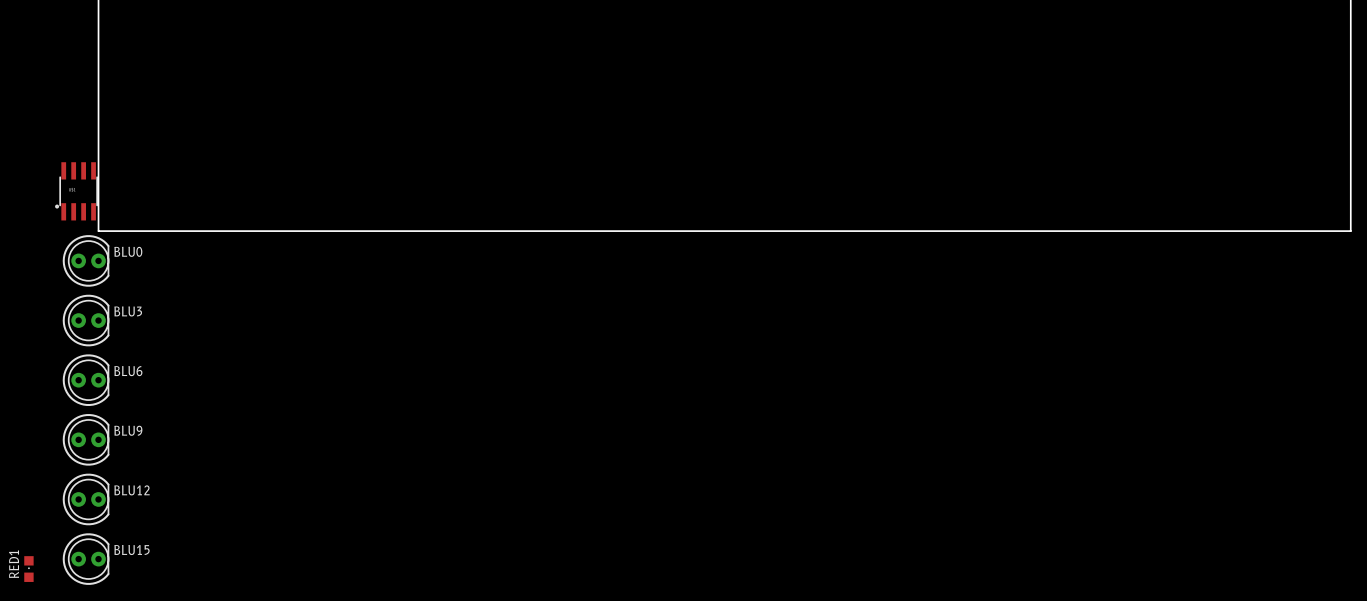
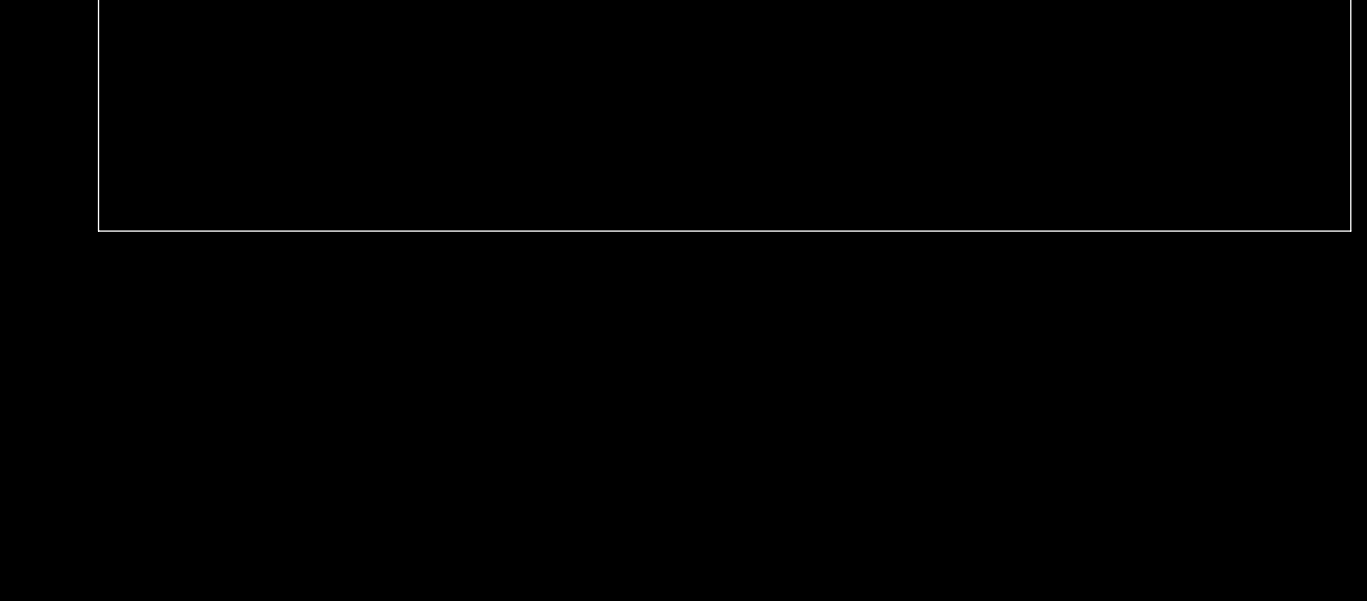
part: (76, 191) -> none
BLU0: (86, 260) -> none
BLU3: (86, 320) -> none
BLU6: (86, 380) -> none
BLU9: (86, 439) -> none
BLU12: (86, 499) -> none
BLU15: (86, 559) -> none
RED1: (28, 569) -> none

